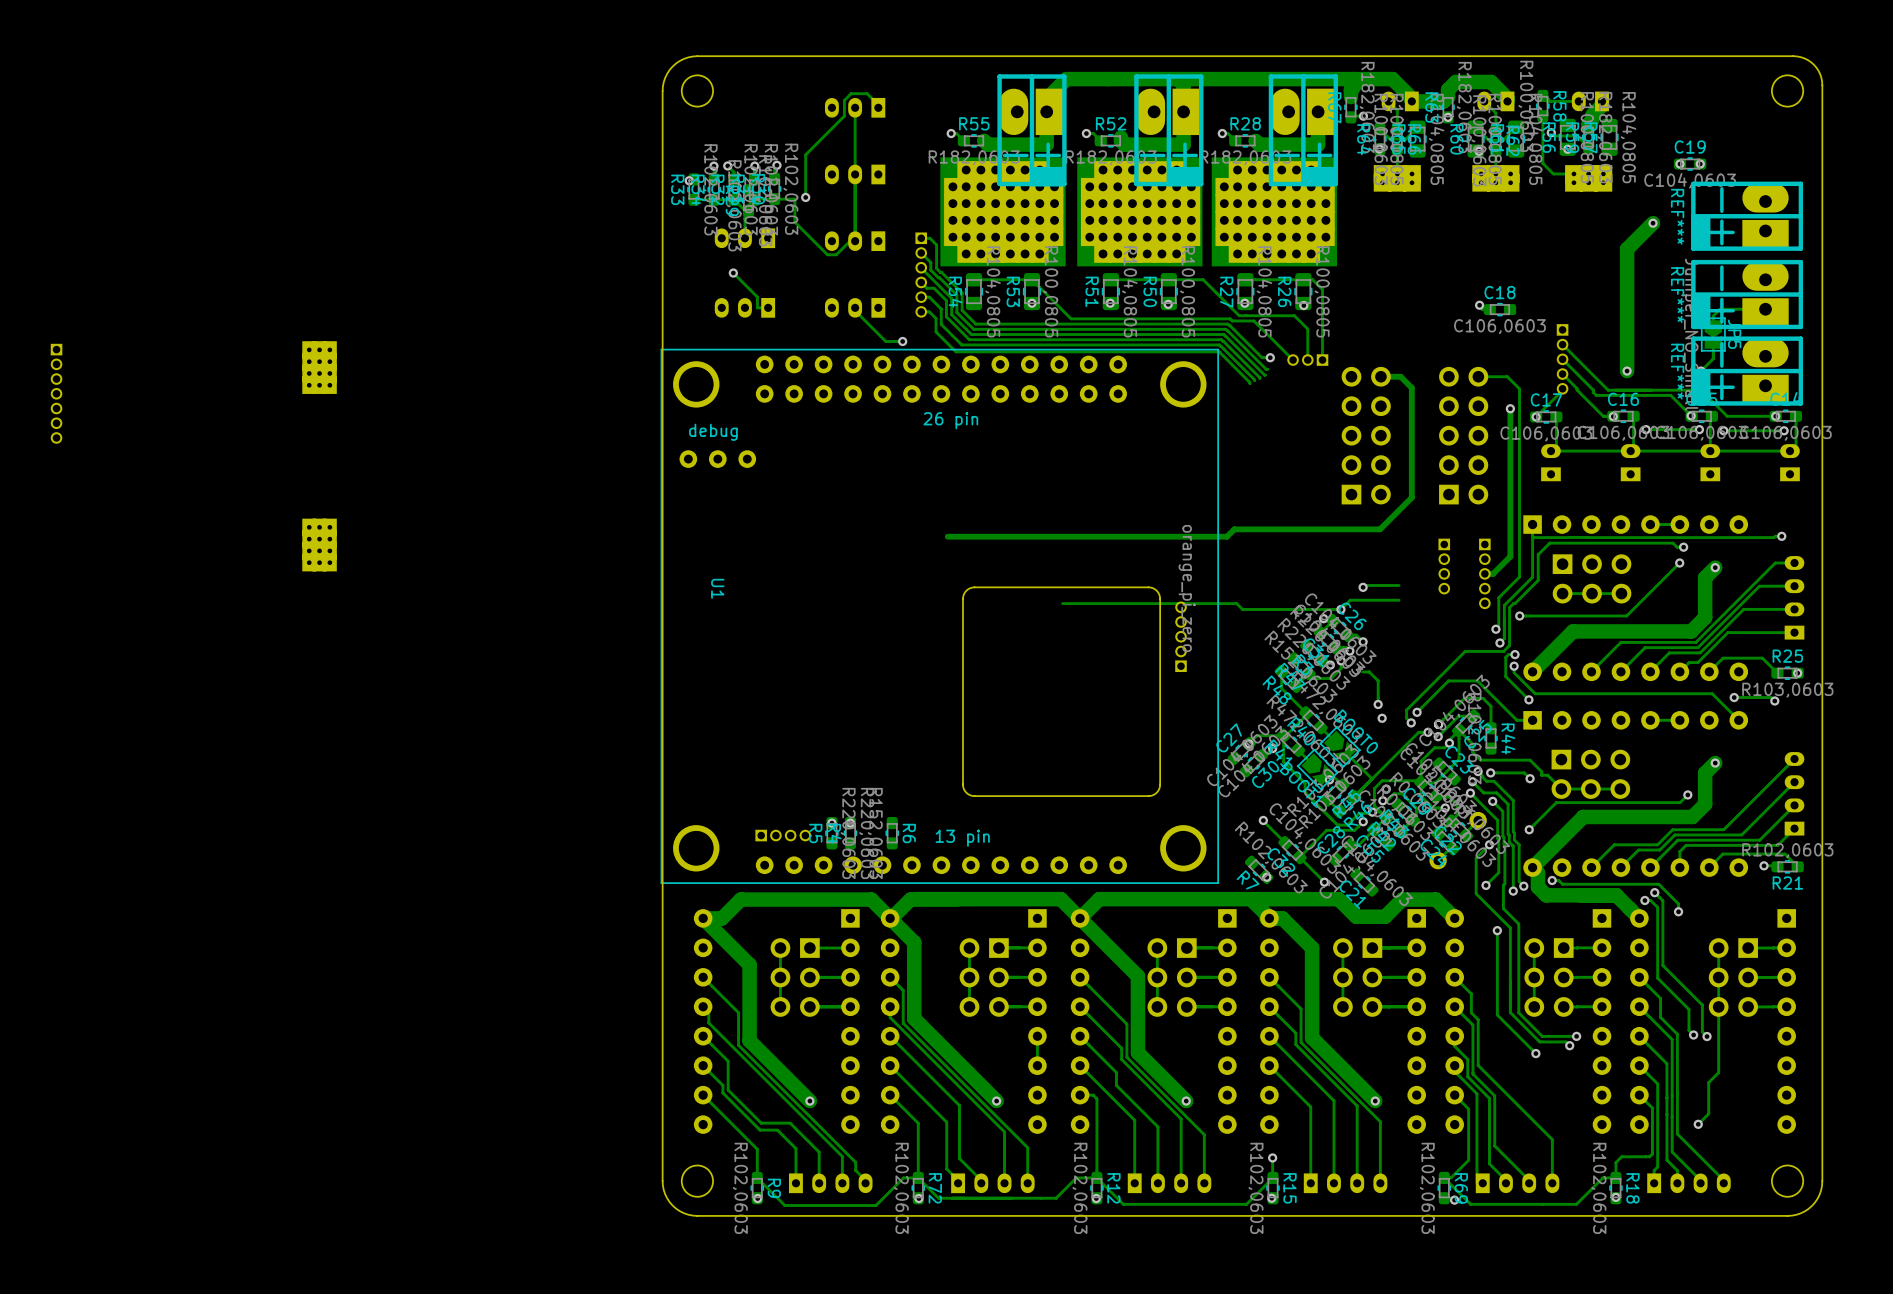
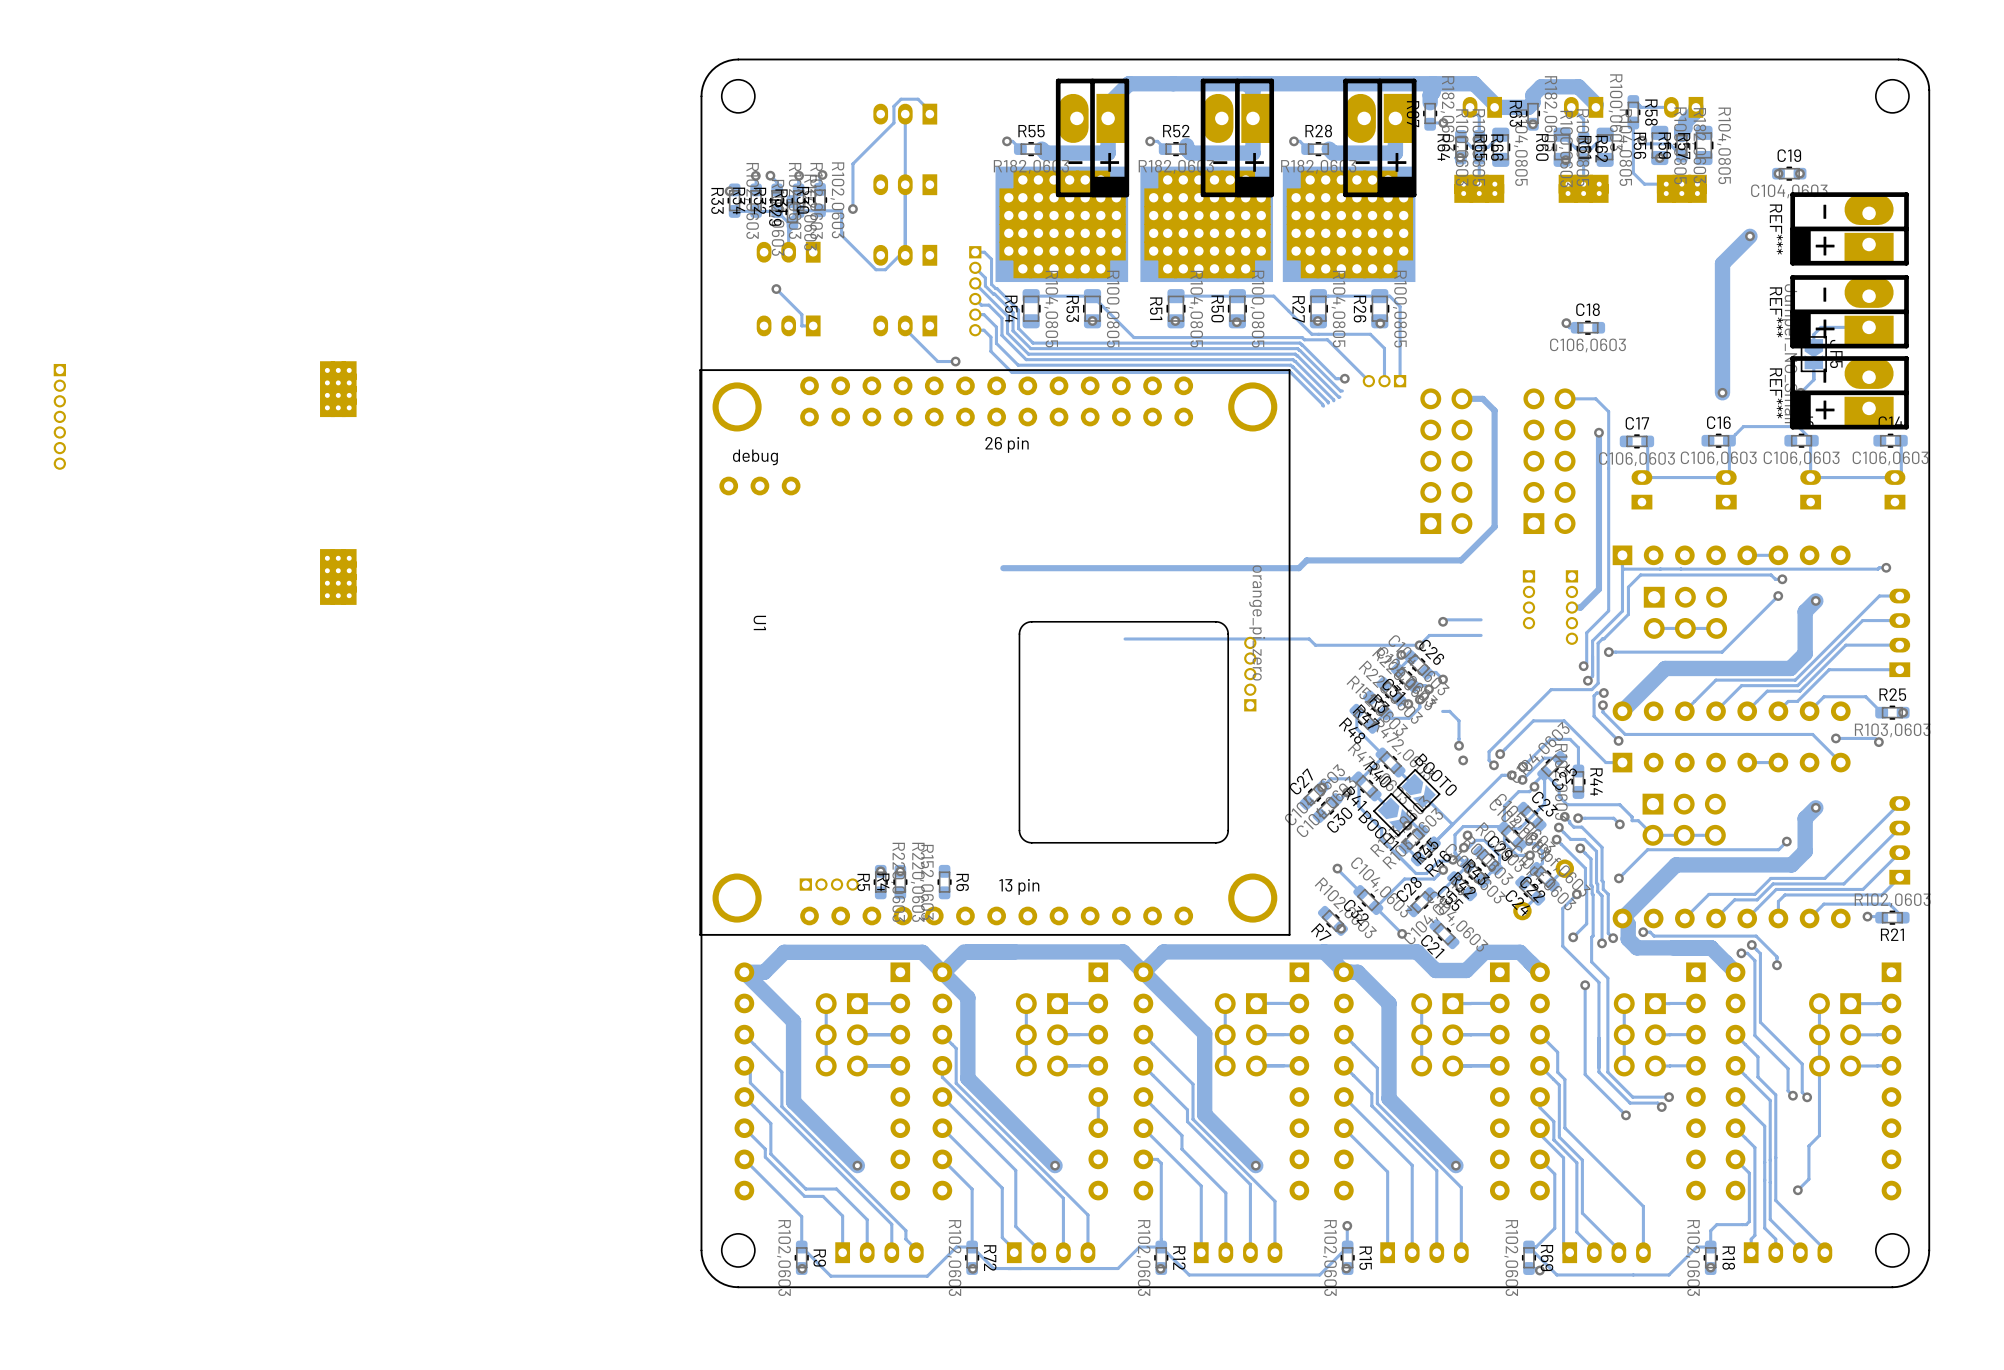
track: (1562, 344) (1608, 390) (1701, 390) (1727, 416) (1775, 416) -> none
track: (1562, 359) (1596, 395) (1670, 395) (1691, 416) -> none
part: (1562, 359) -> none
track: (1562, 374) (1603, 416) (1613, 416) -> none
track: (1562, 388) (1536, 416) -> none
via: (1691, 415) -> none
via: (1536, 416) -> none
via: (1613, 416) -> none
track: none -> (1812, 440) (1798, 426) (1743, 426) (1729, 440)
via: (1775, 416) -> none
via: (1646, 429) -> none
track: (1699, 429) (1646, 429) -> none
via: (1699, 429) -> none
via: (1723, 430) -> none
track: (1784, 430) (1723, 430) -> none
via: (1784, 430) -> none
track: (1710, 451) (1630, 451) -> none

